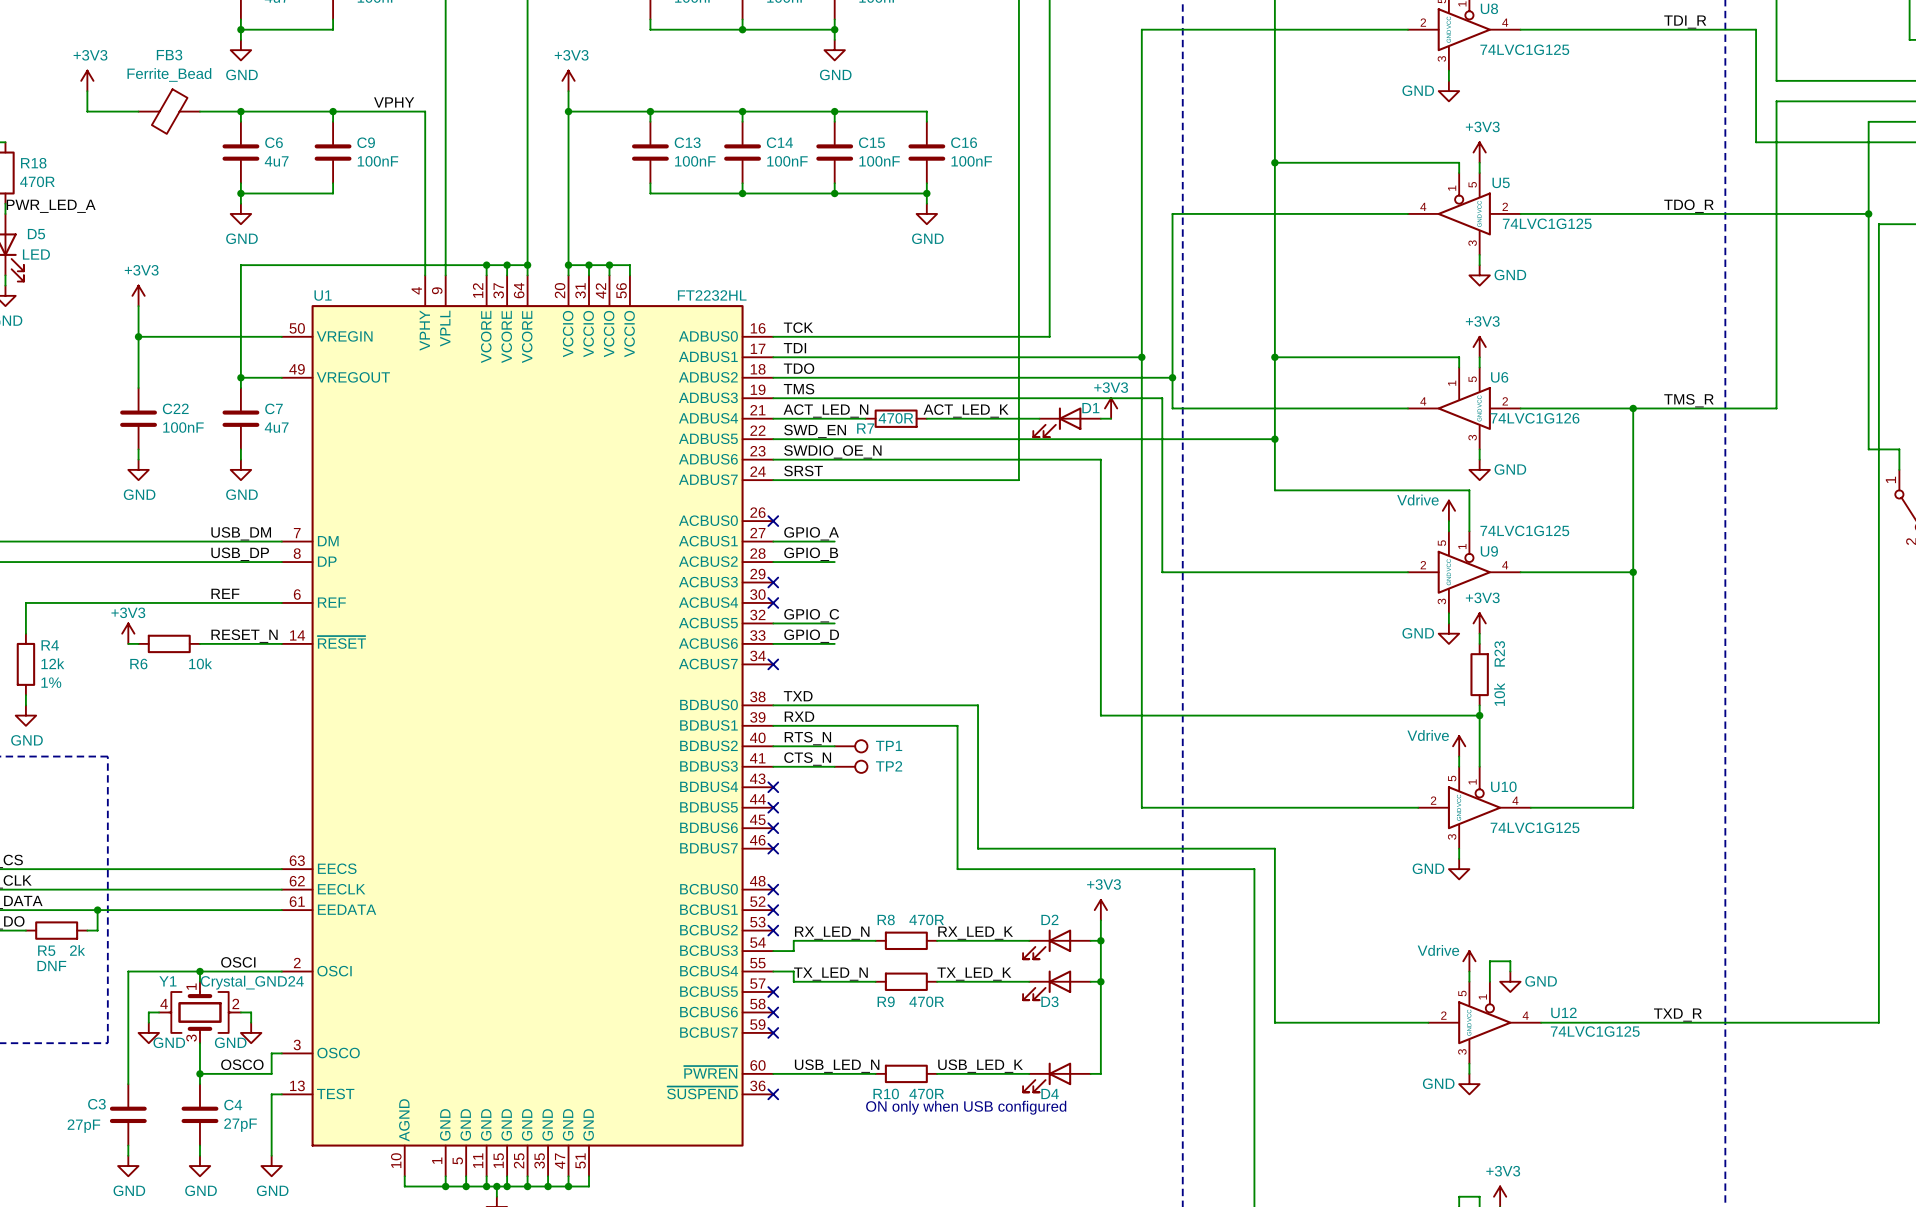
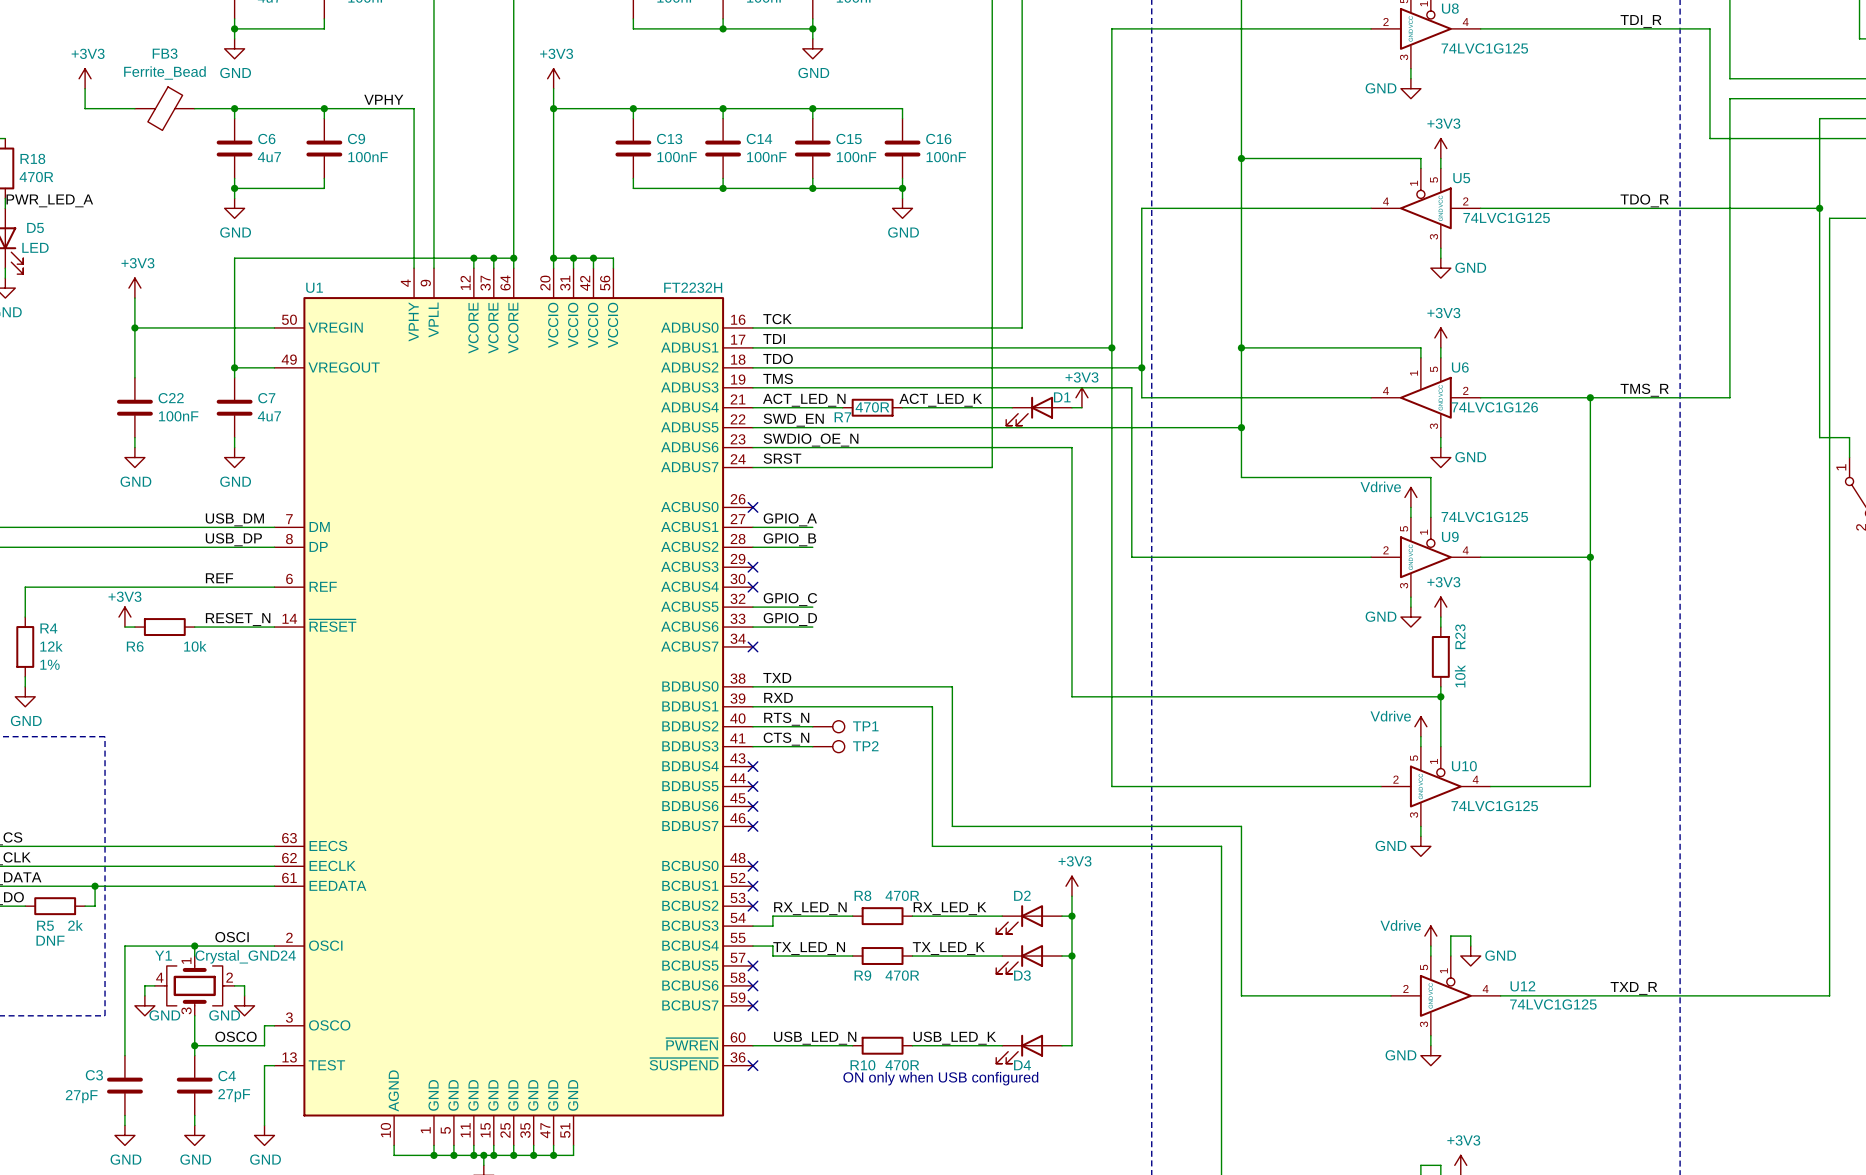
U1 value: FT2232HL (712, 295) -> FT2232H (693, 287)

